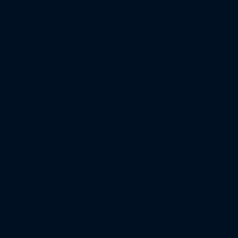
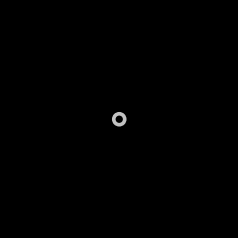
via: none -> (119, 119)

